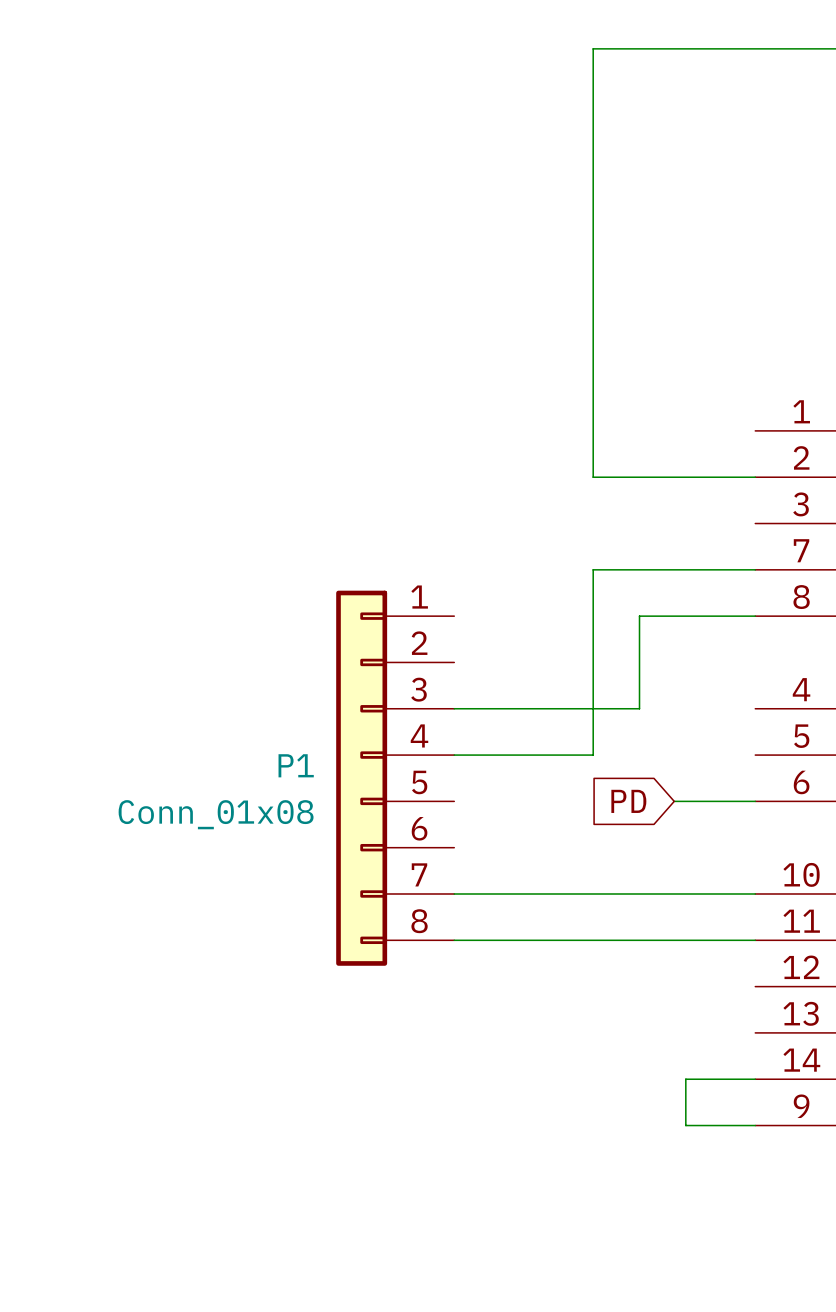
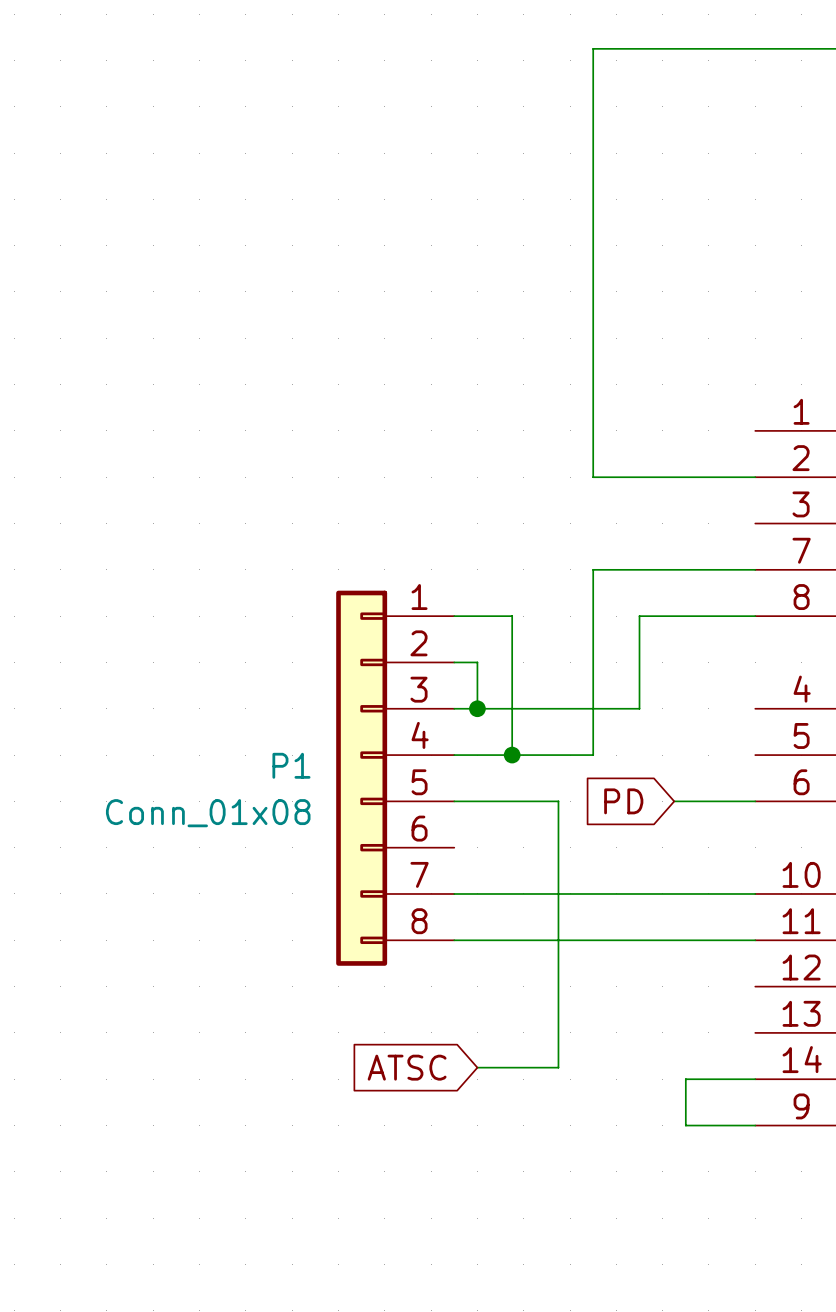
wire: none -> (454, 616) (512, 616) (512, 755)
wire: none -> (454, 662) (477, 662) (477, 708)
junction: none -> (477, 708)
junction: none -> (512, 755)
wire: none -> (454, 801) (558, 801) (558, 1067) (477, 1067)
global label: none -> ATSC (407, 1067)

